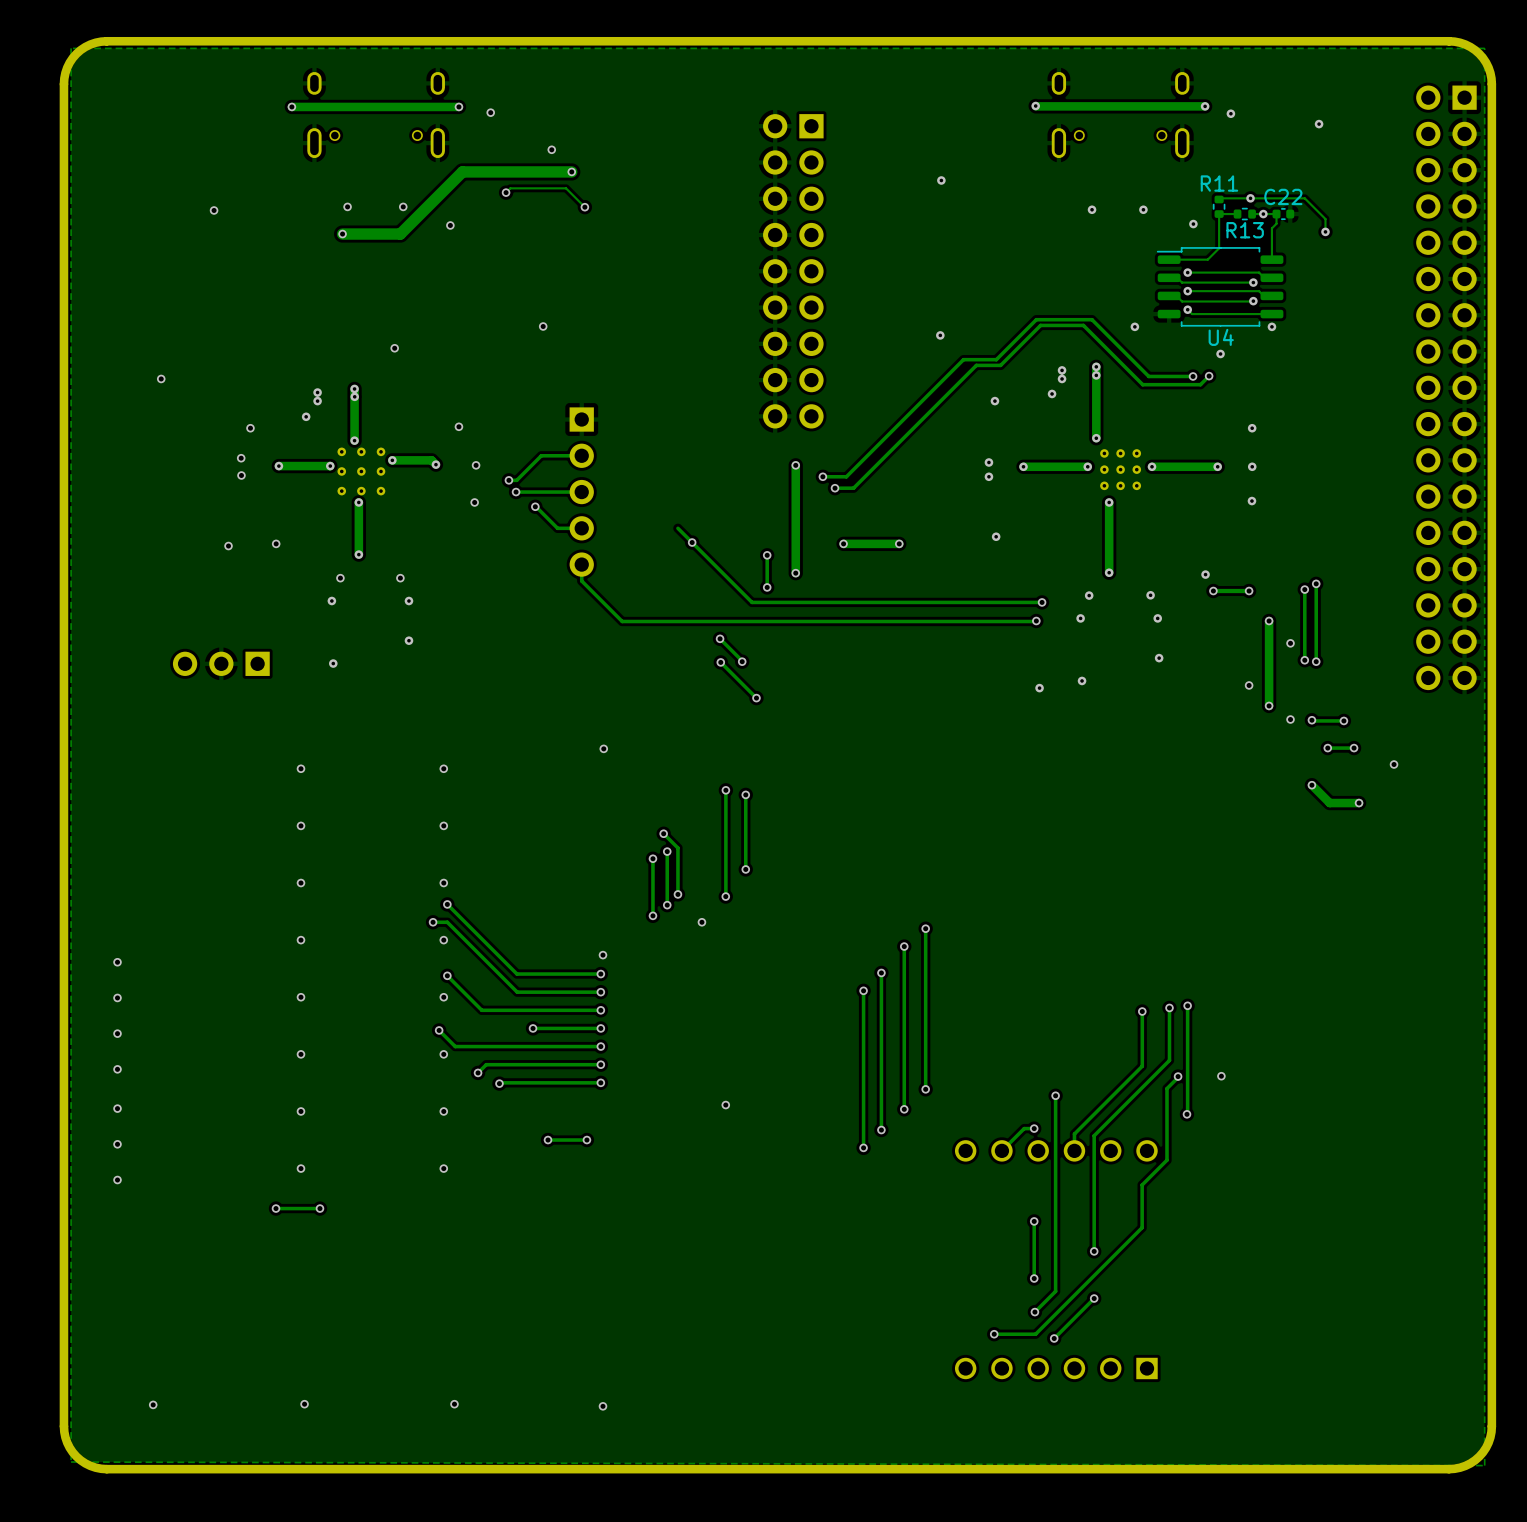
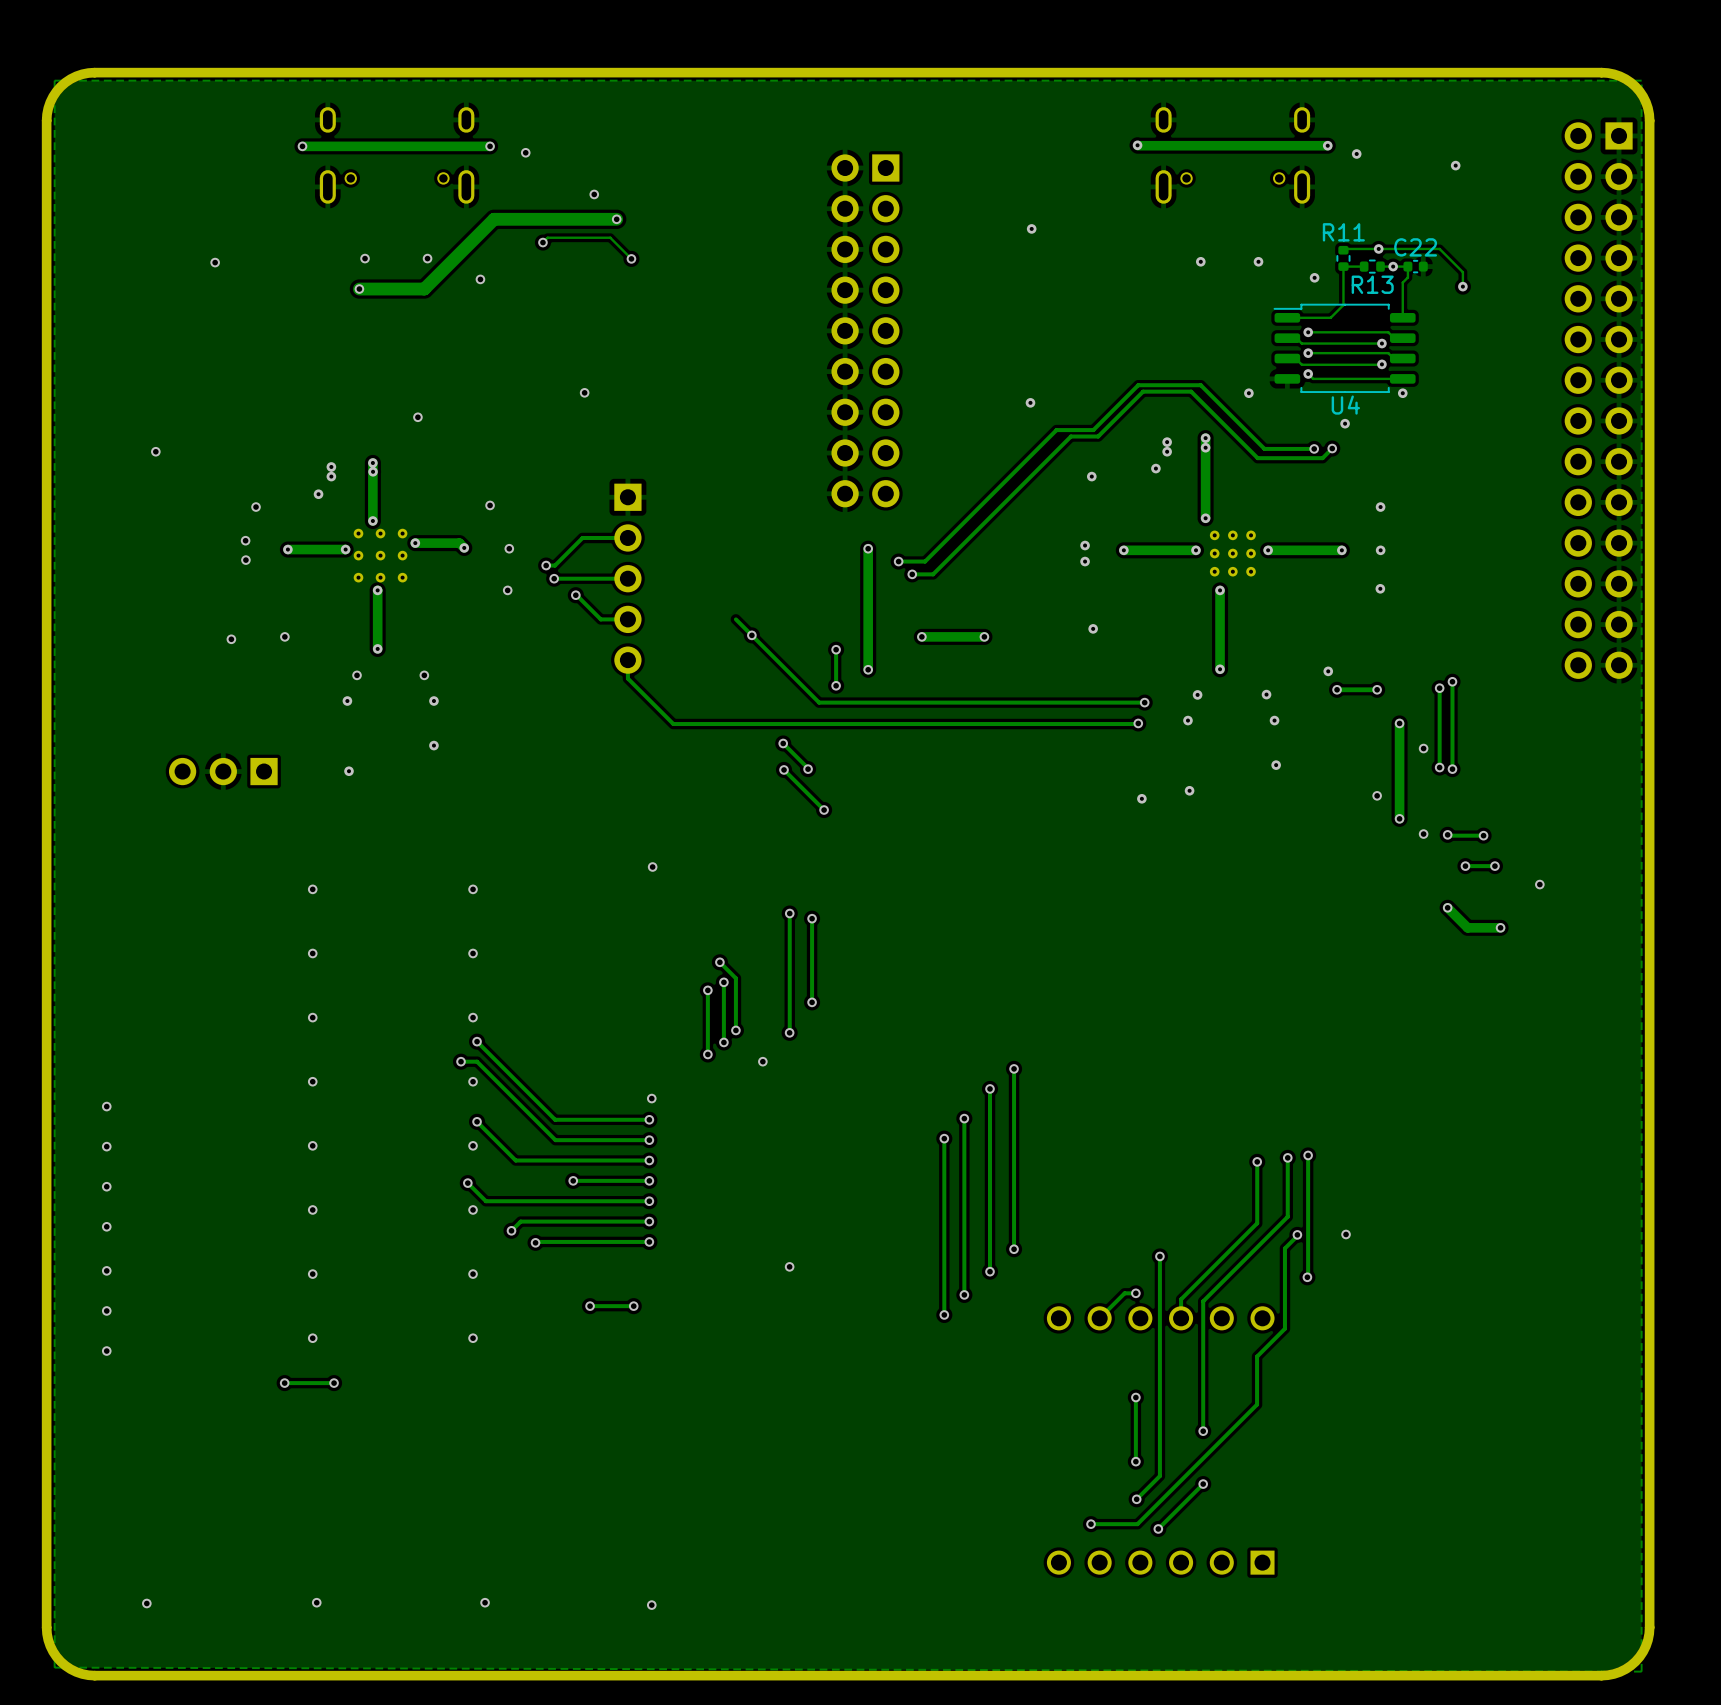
part: (1446, 387) -> none

